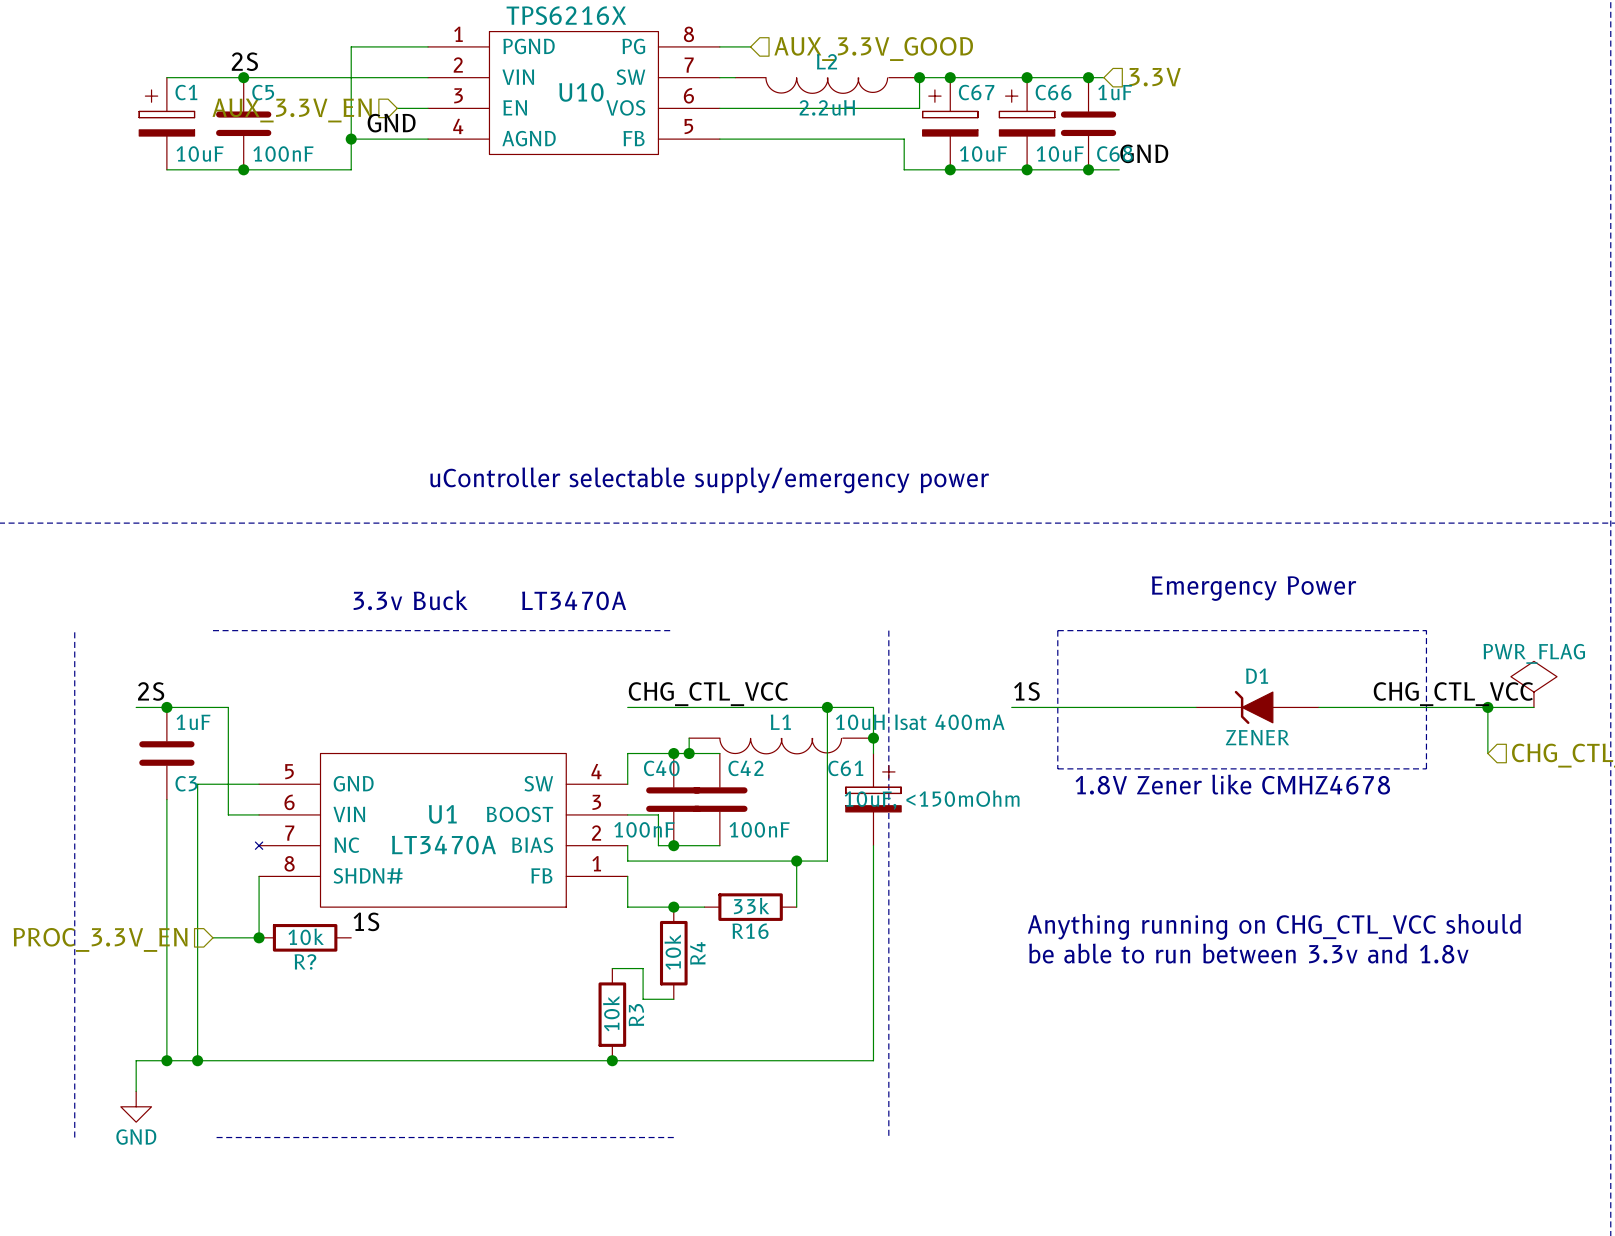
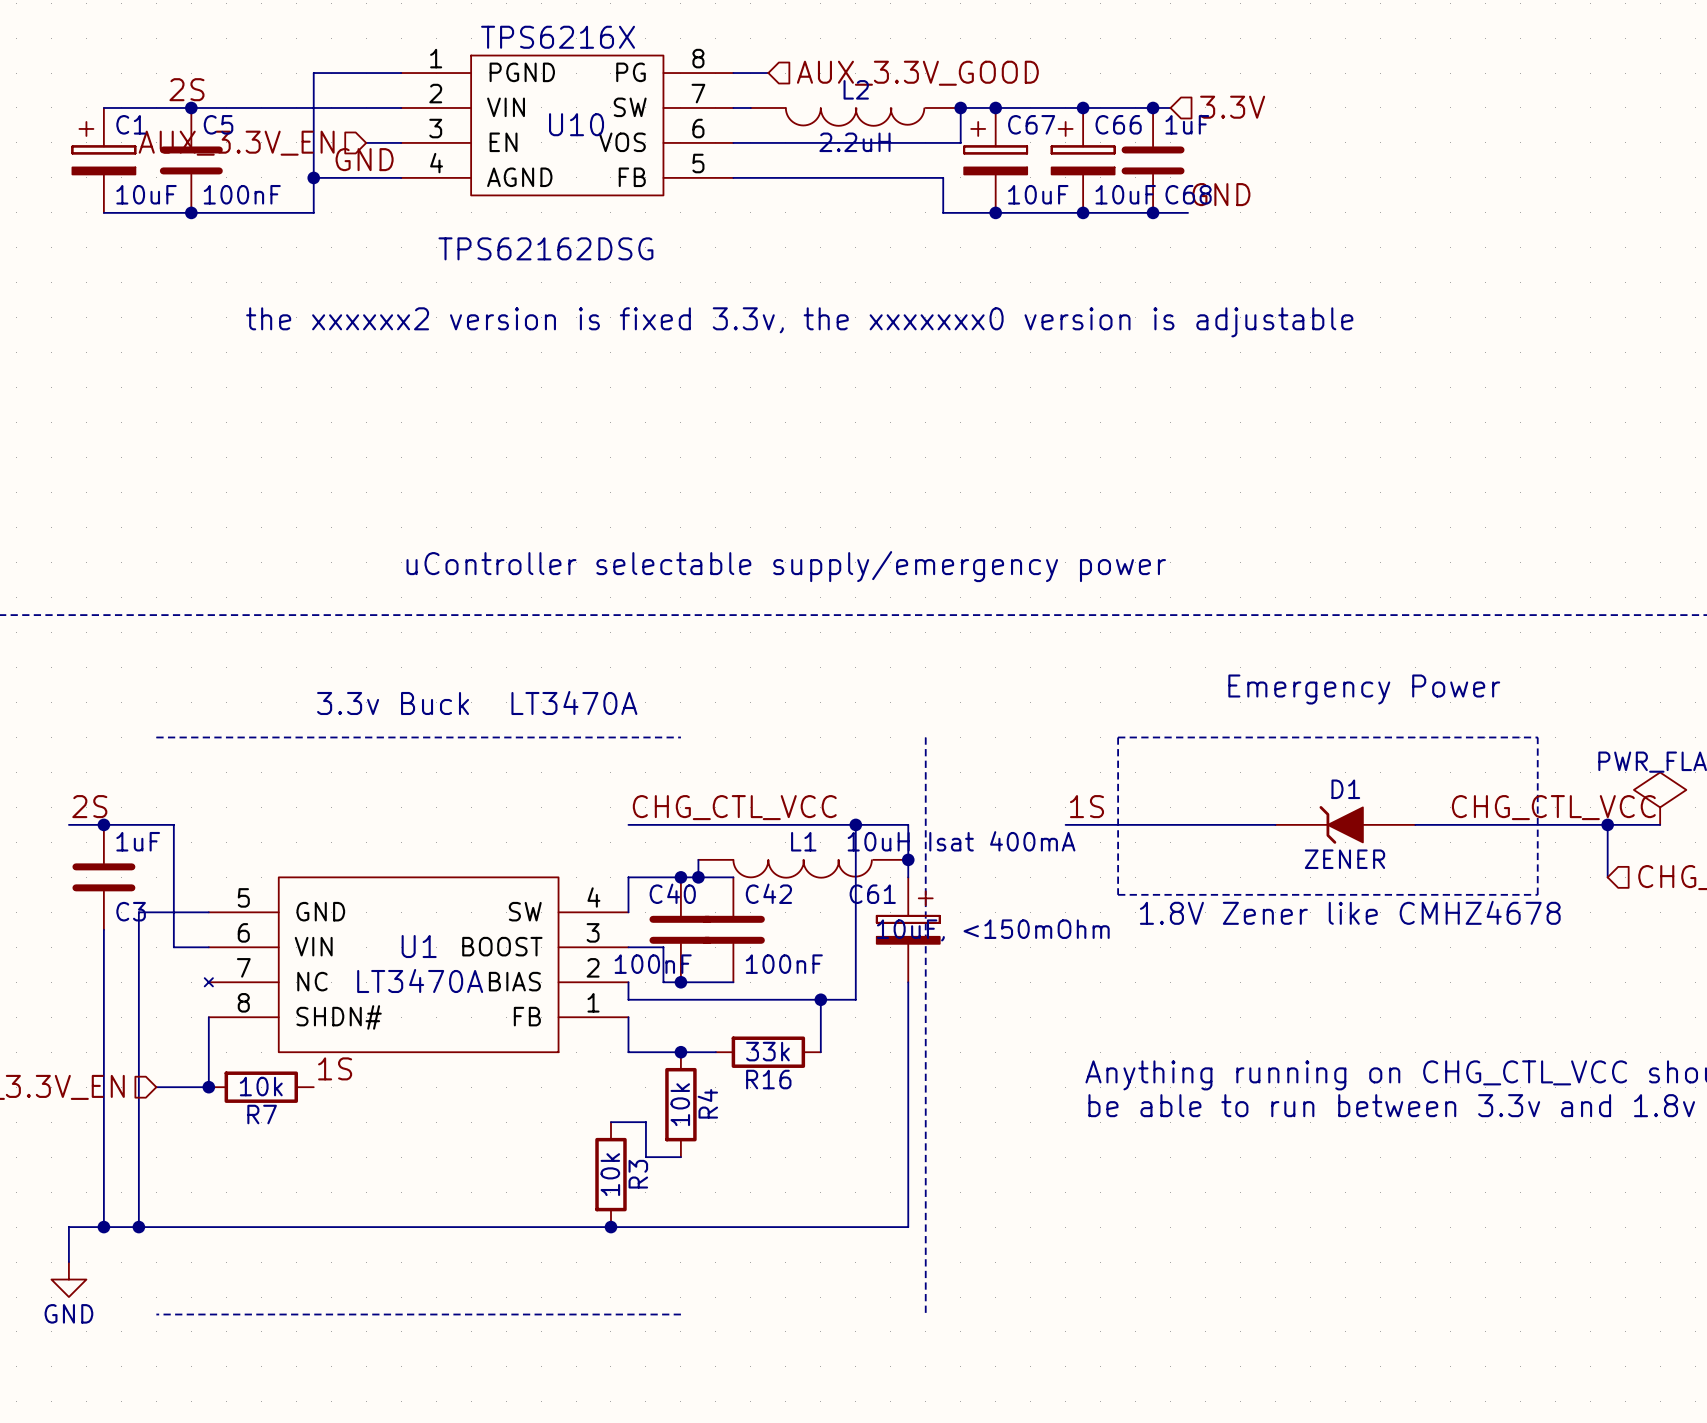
text: none -> TPS62162DSG (545, 248)
text: none -> the xxxxxx2 version is fixed 3.3v, the xxxxxxx0 version is adjustable (799, 322)
R? name: R? (305, 961) -> R7 (262, 1114)

